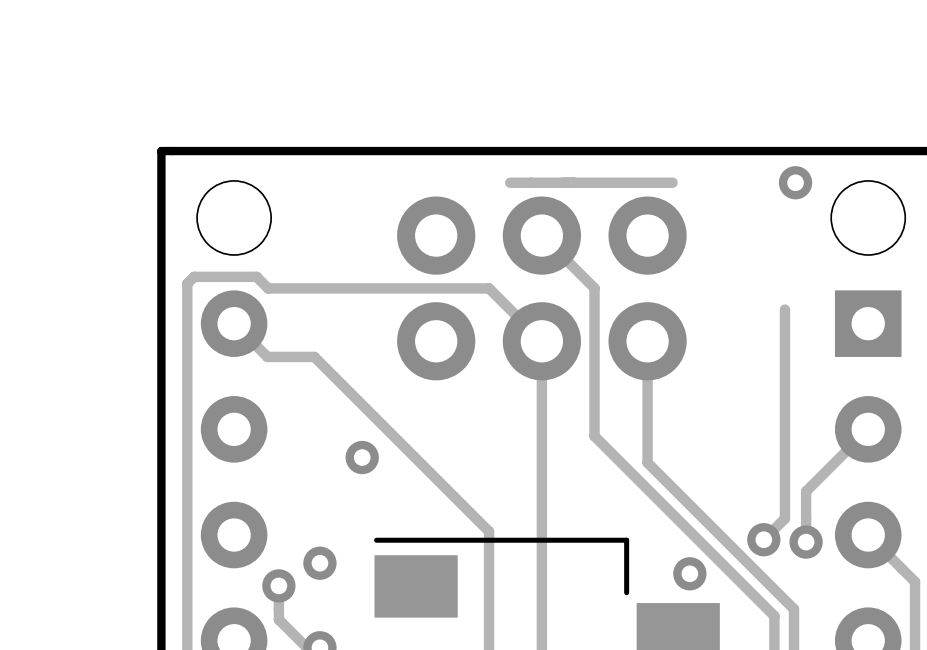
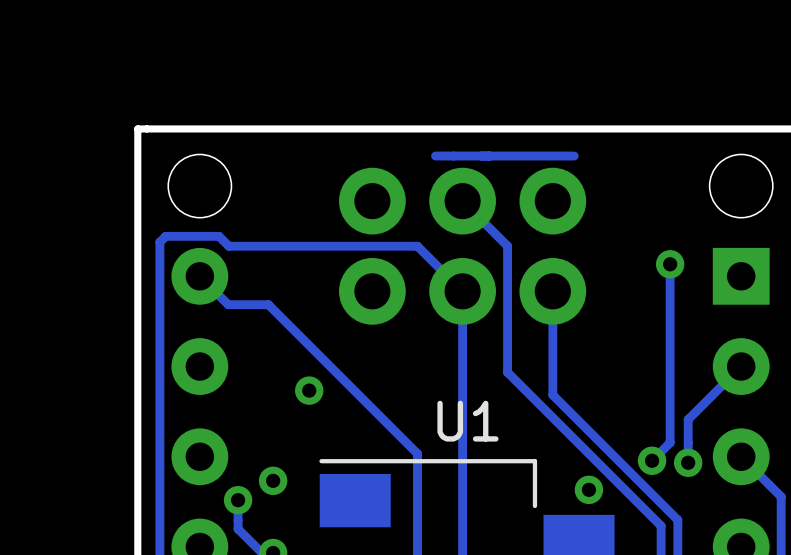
via position: (795, 182) -> (670, 264)
U1 name: none -> U1 (467, 421)

